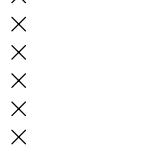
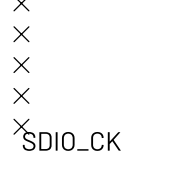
label: none -> SDIO_CK (71, 141)
no-connect mark: (18, 137) -> none

